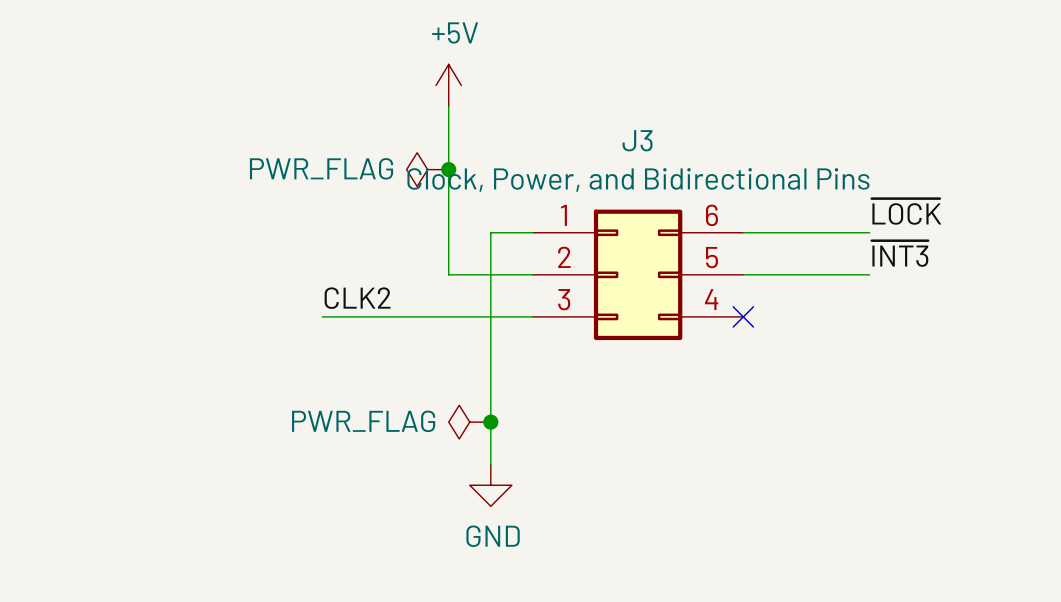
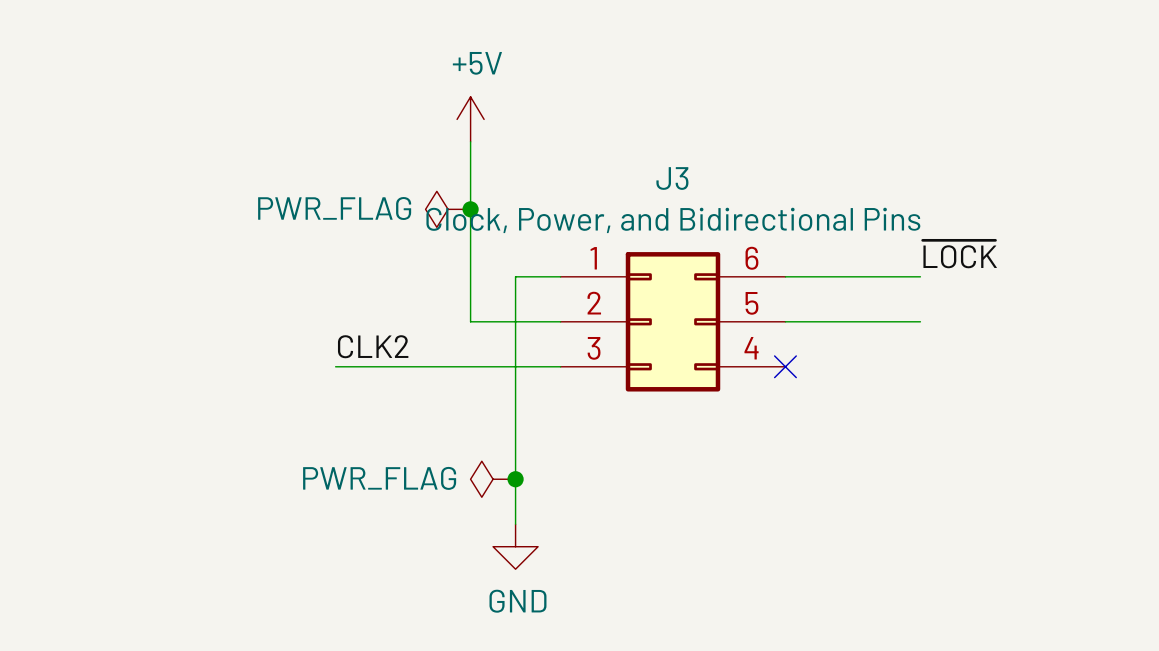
label: ~{INT3} (900, 253) -> none

